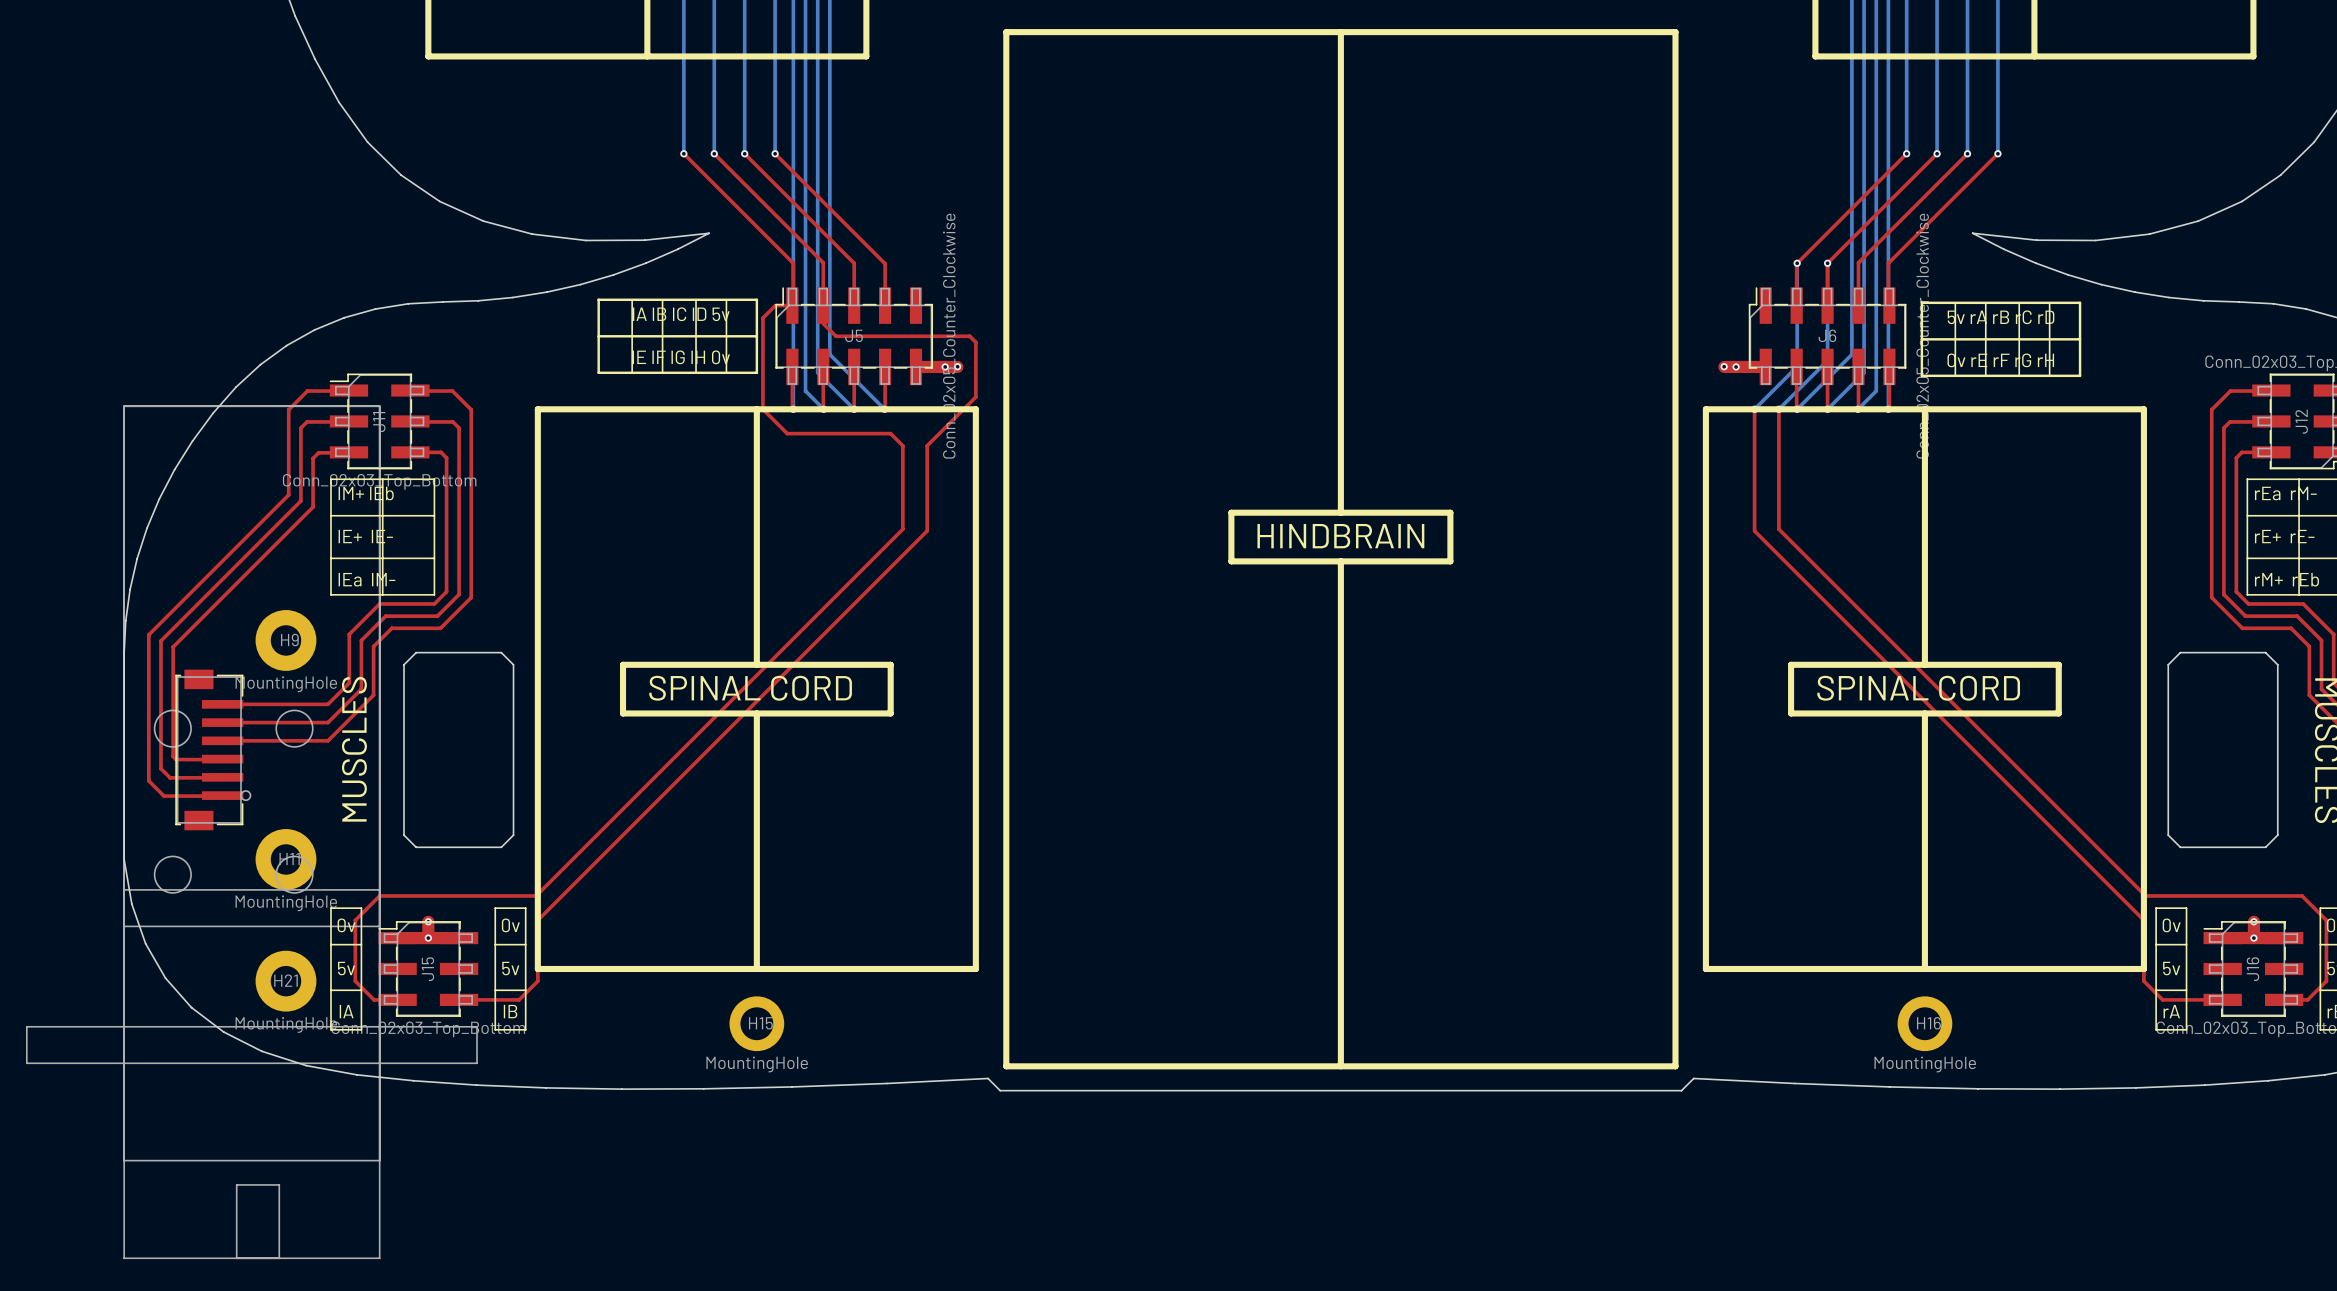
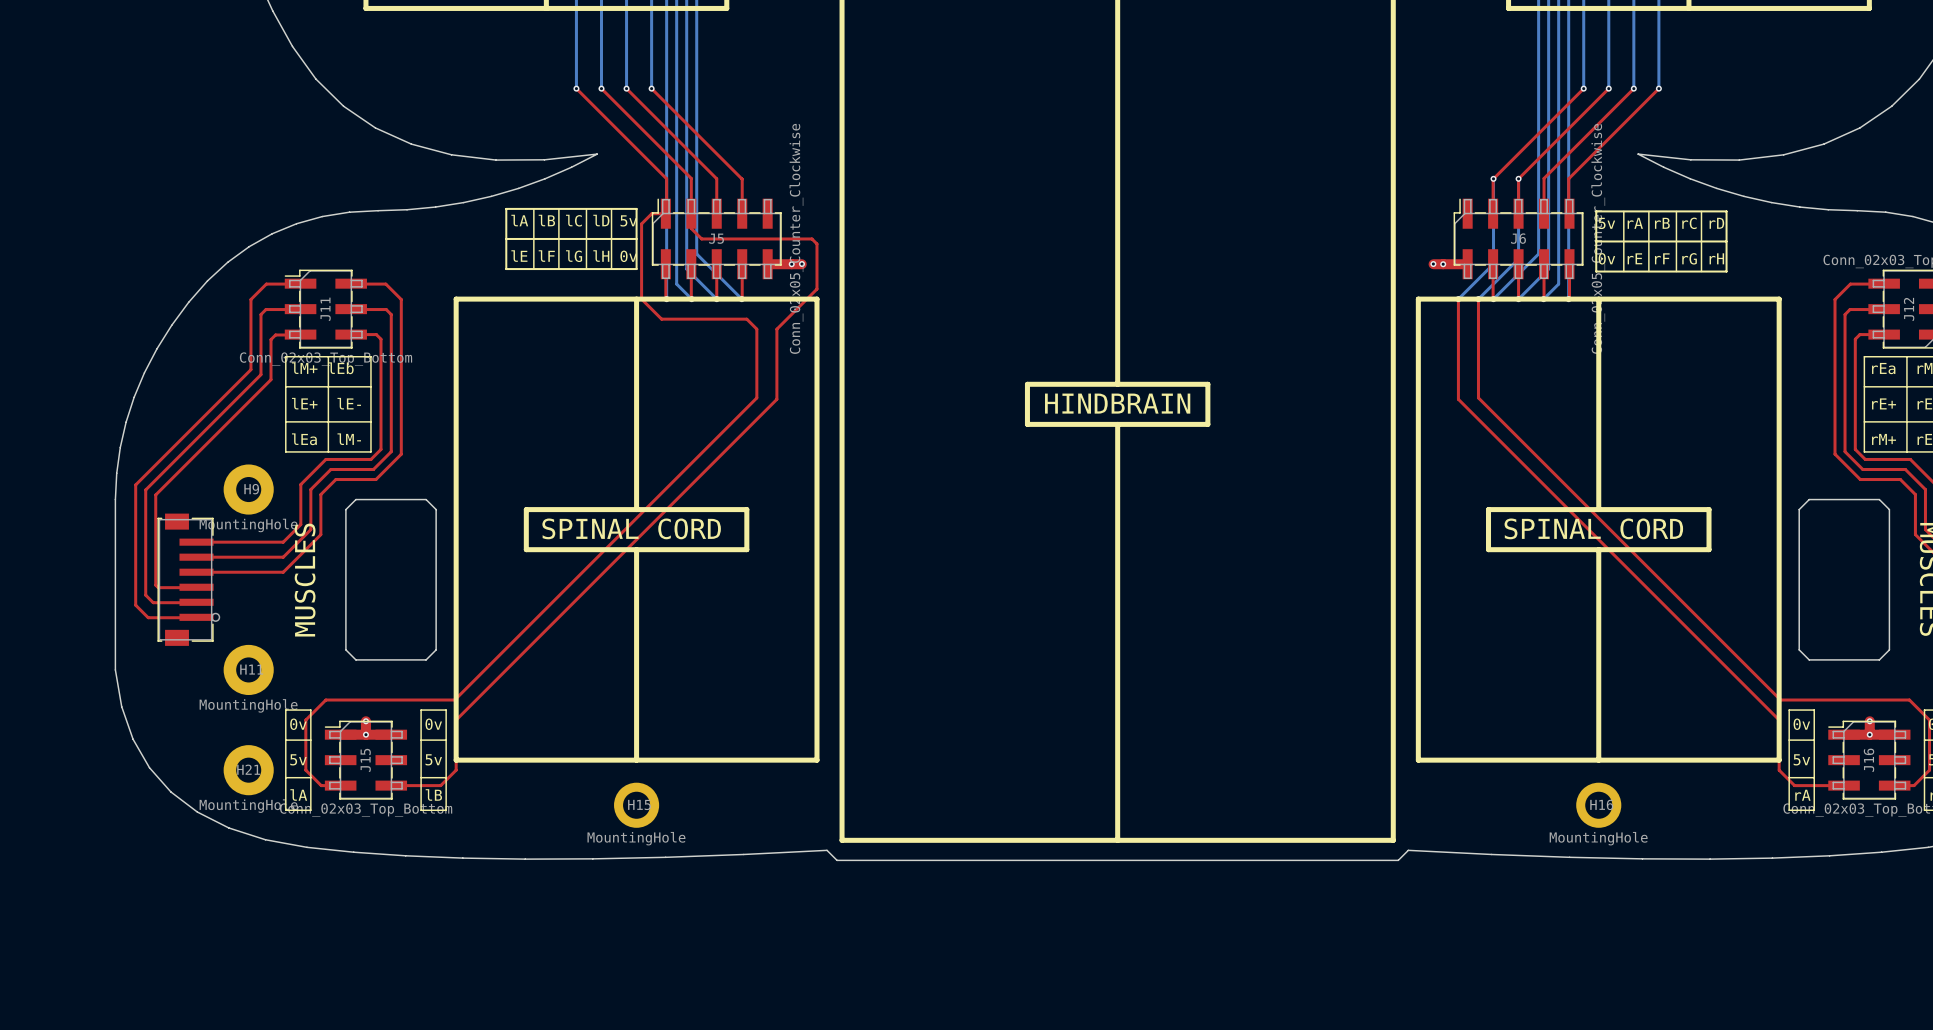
line: (124, 406) (379, 406) (379, 1258) (124, 1258) (124, 406) -> none
drawing: [153, 709, 192, 748] -> none
drawing: [275, 709, 314, 748] -> none
drawing: [153, 855, 192, 894] -> none
drawing: [275, 855, 314, 894] -> none
line: (124, 889) (379, 889) -> none
line: (124, 926) (379, 926) -> none
line: (26, 1026) (477, 1026) (477, 1063) (26, 1063) (26, 1026) -> none
line: (124, 1160) (379, 1160) -> none
line: (236, 1258) (236, 1184) (279, 1184) (279, 1258) -> none

